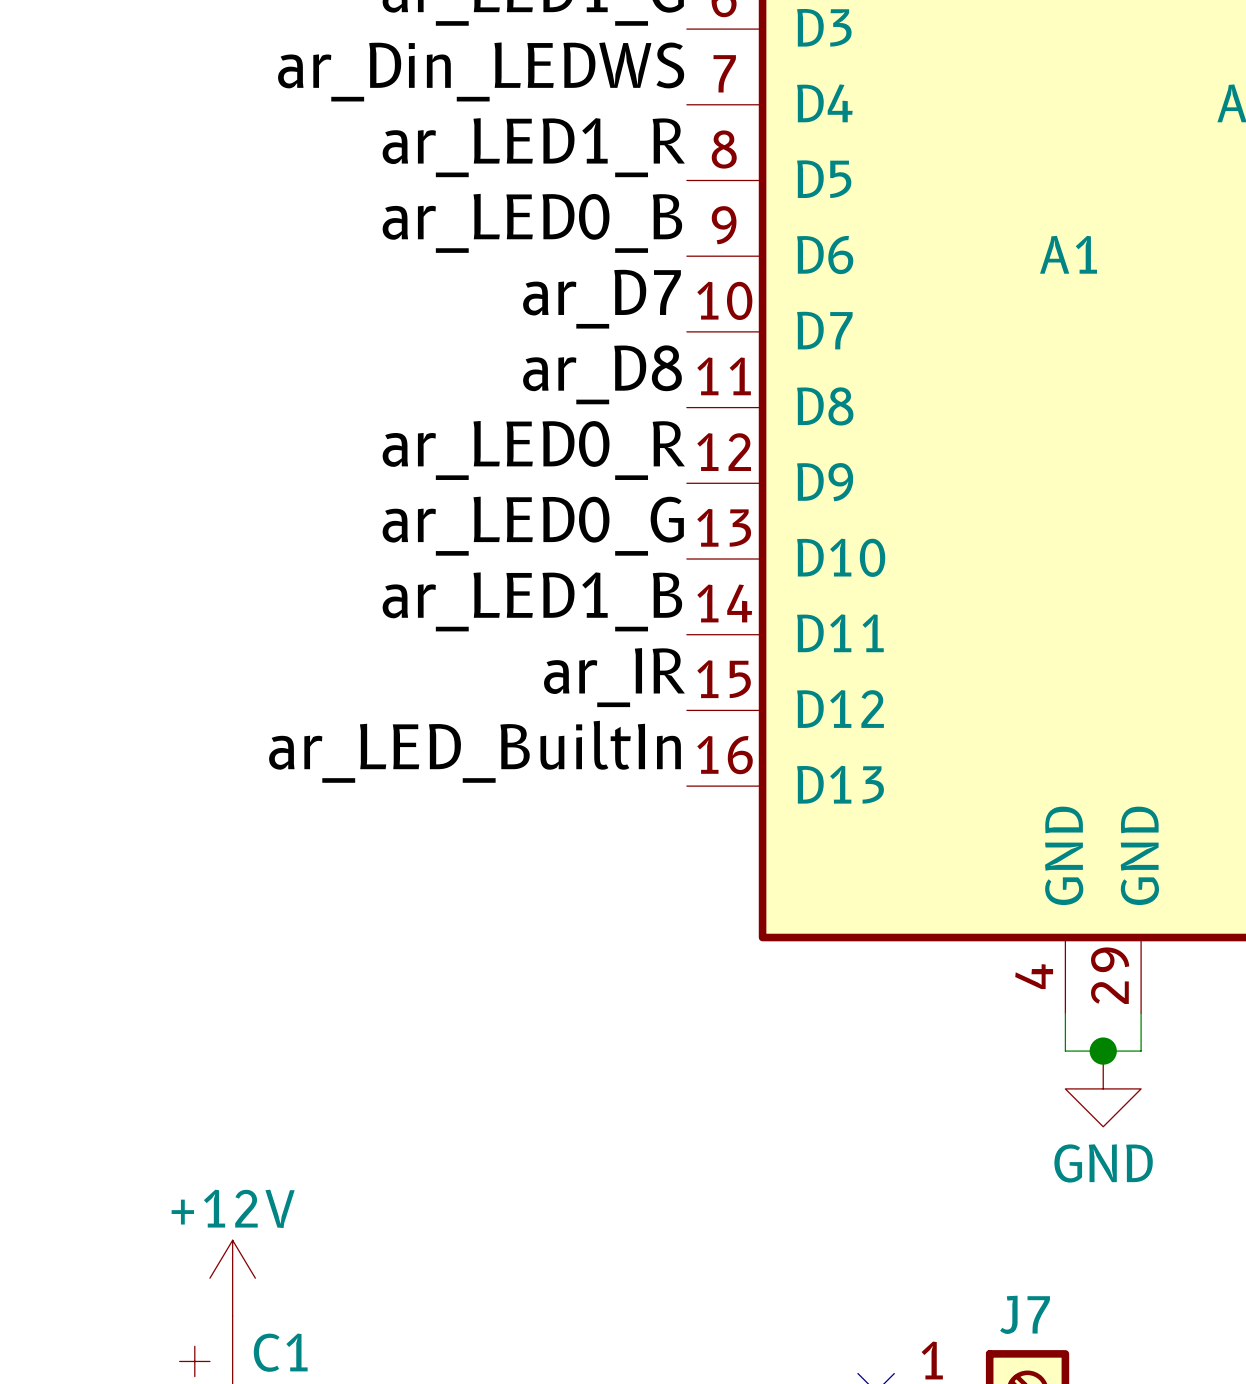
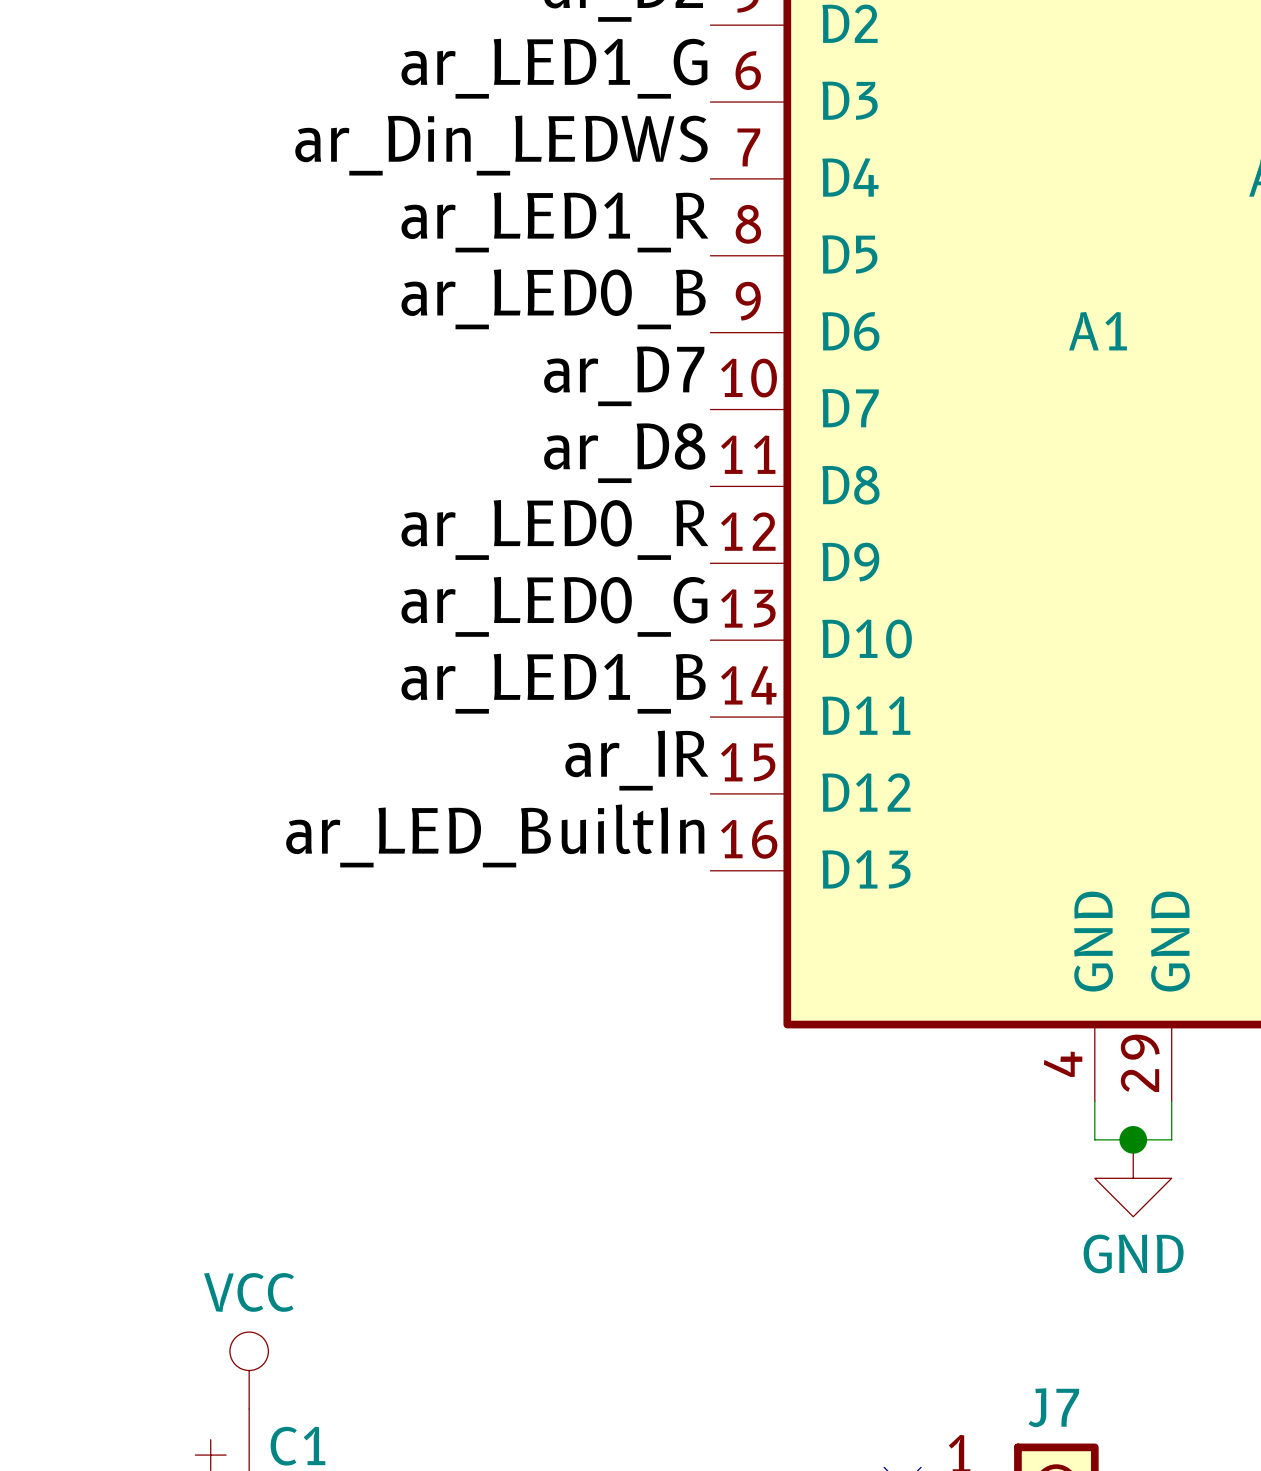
power symbol: +12V (232, 1278) -> VCC (249, 1370)

